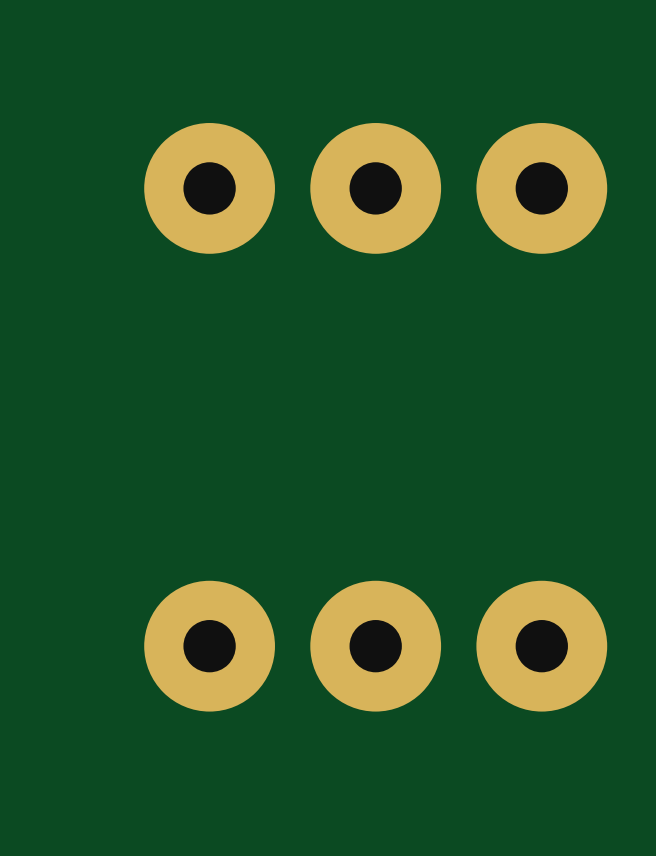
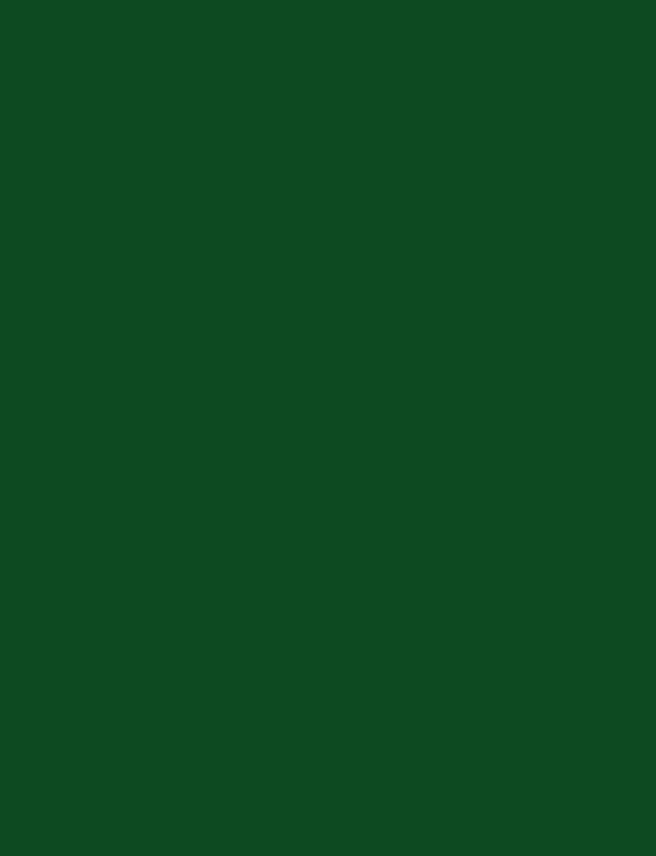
part: (375, 188) -> none
part: (375, 646) -> none

